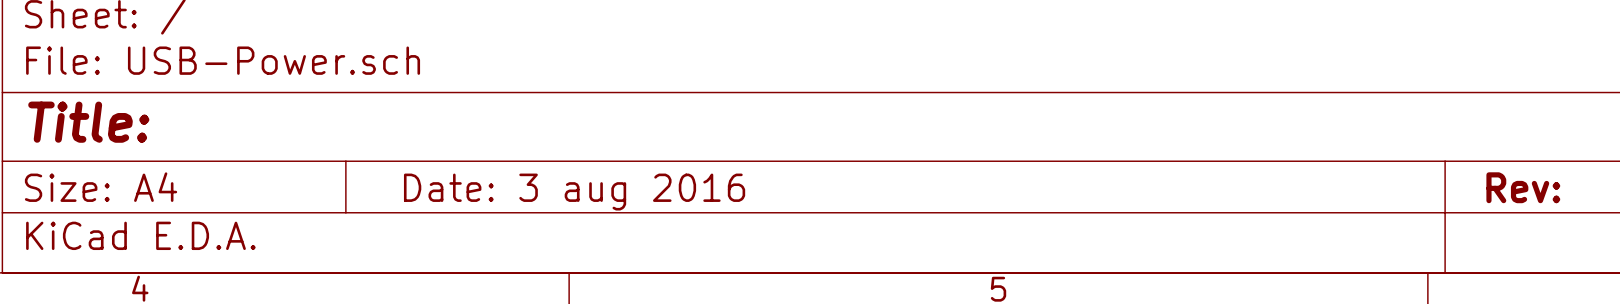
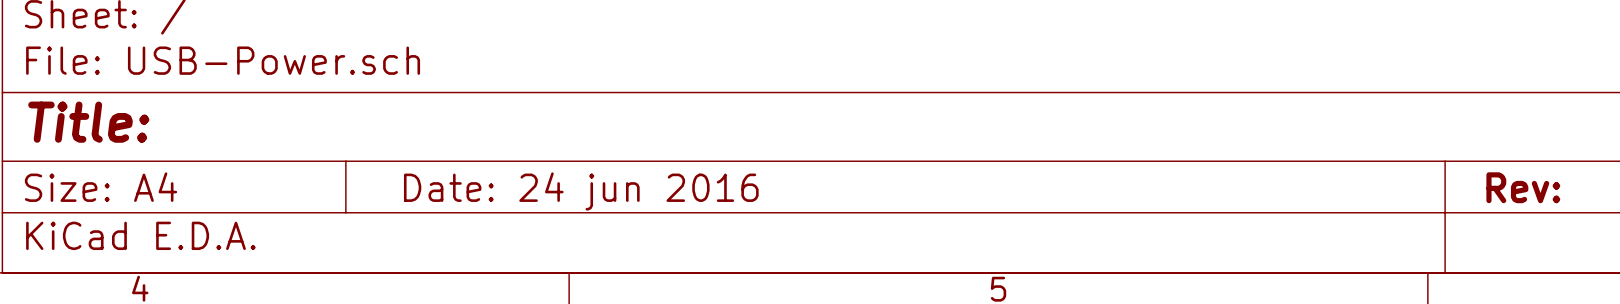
title block: Date: 3 aug 2016 (574, 192) -> Date: 24 jun 2016 (581, 191)

